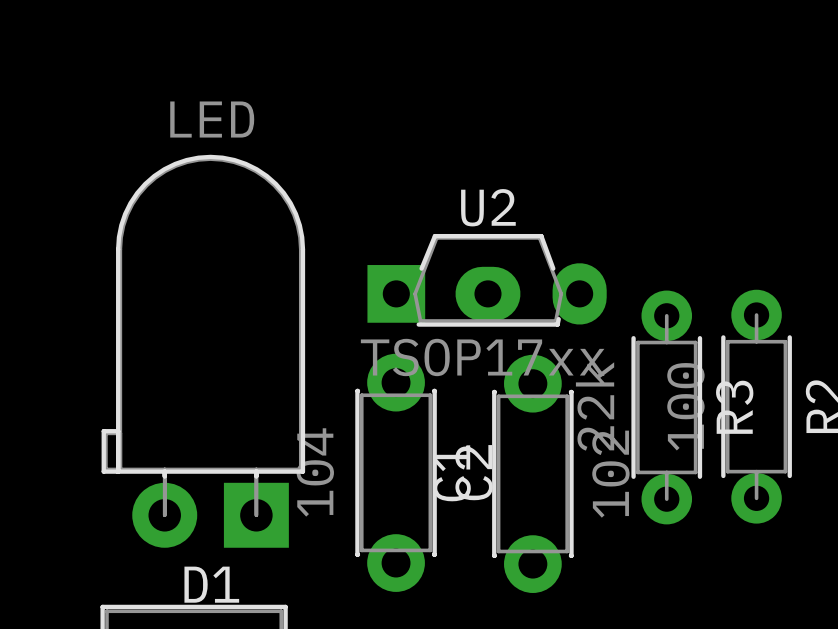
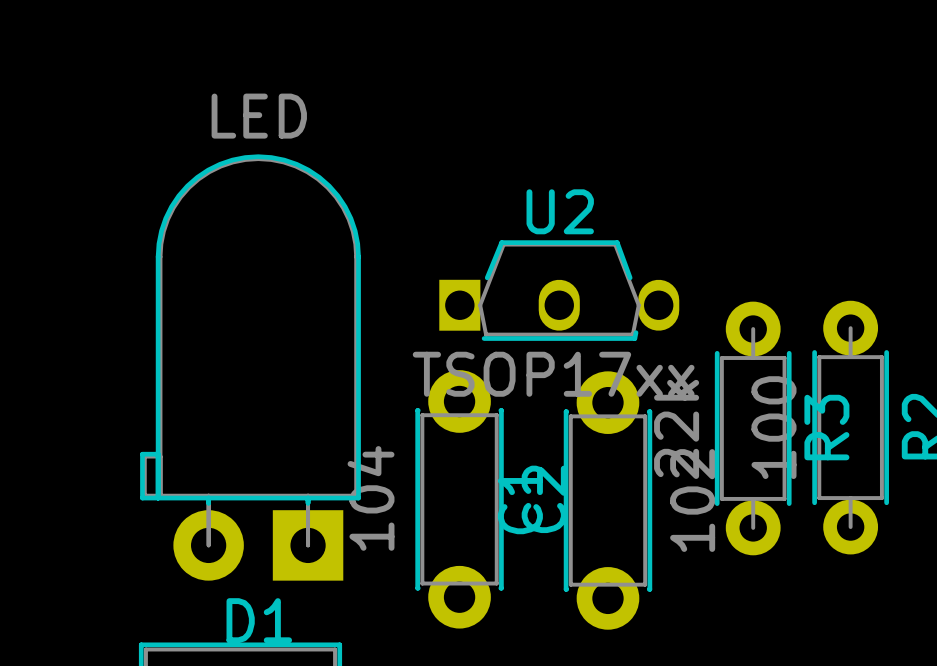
U2 footprint: [367, 233, 607, 327] -> [439, 240, 680, 341]

